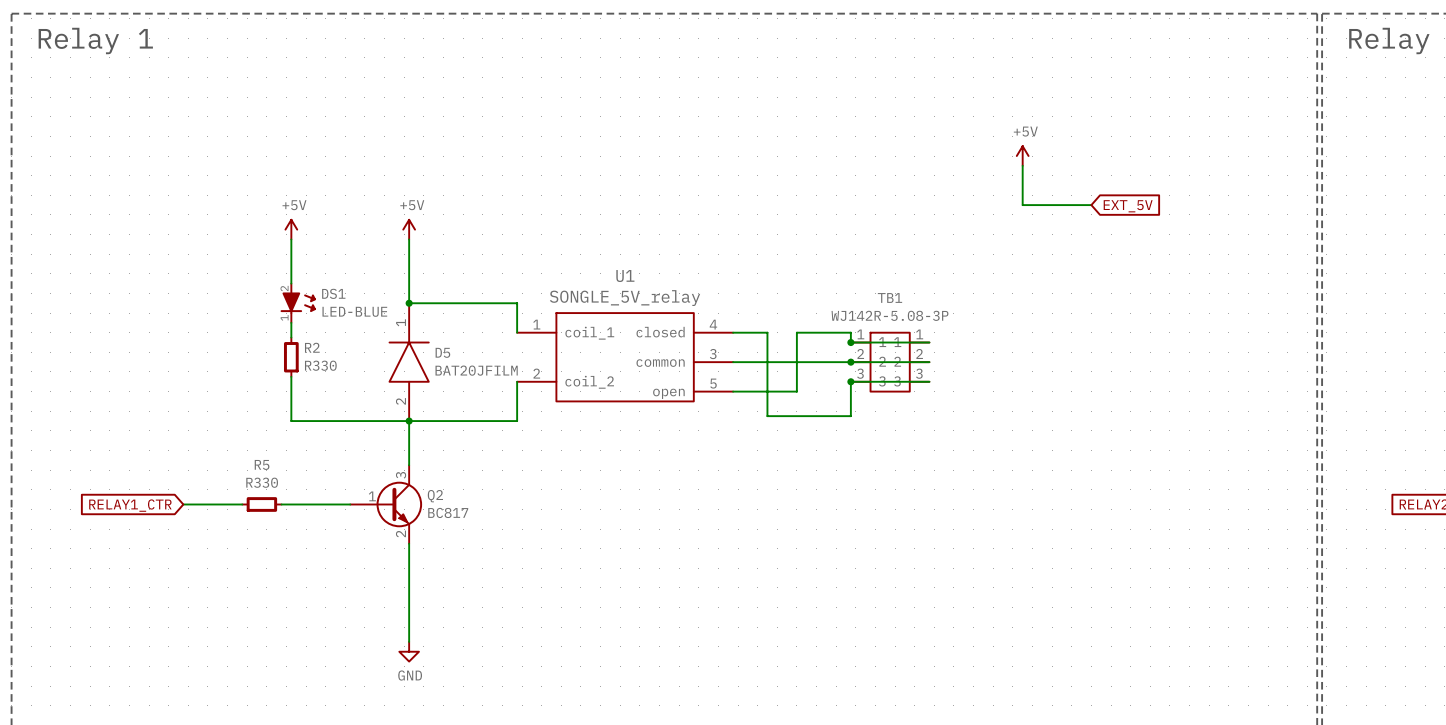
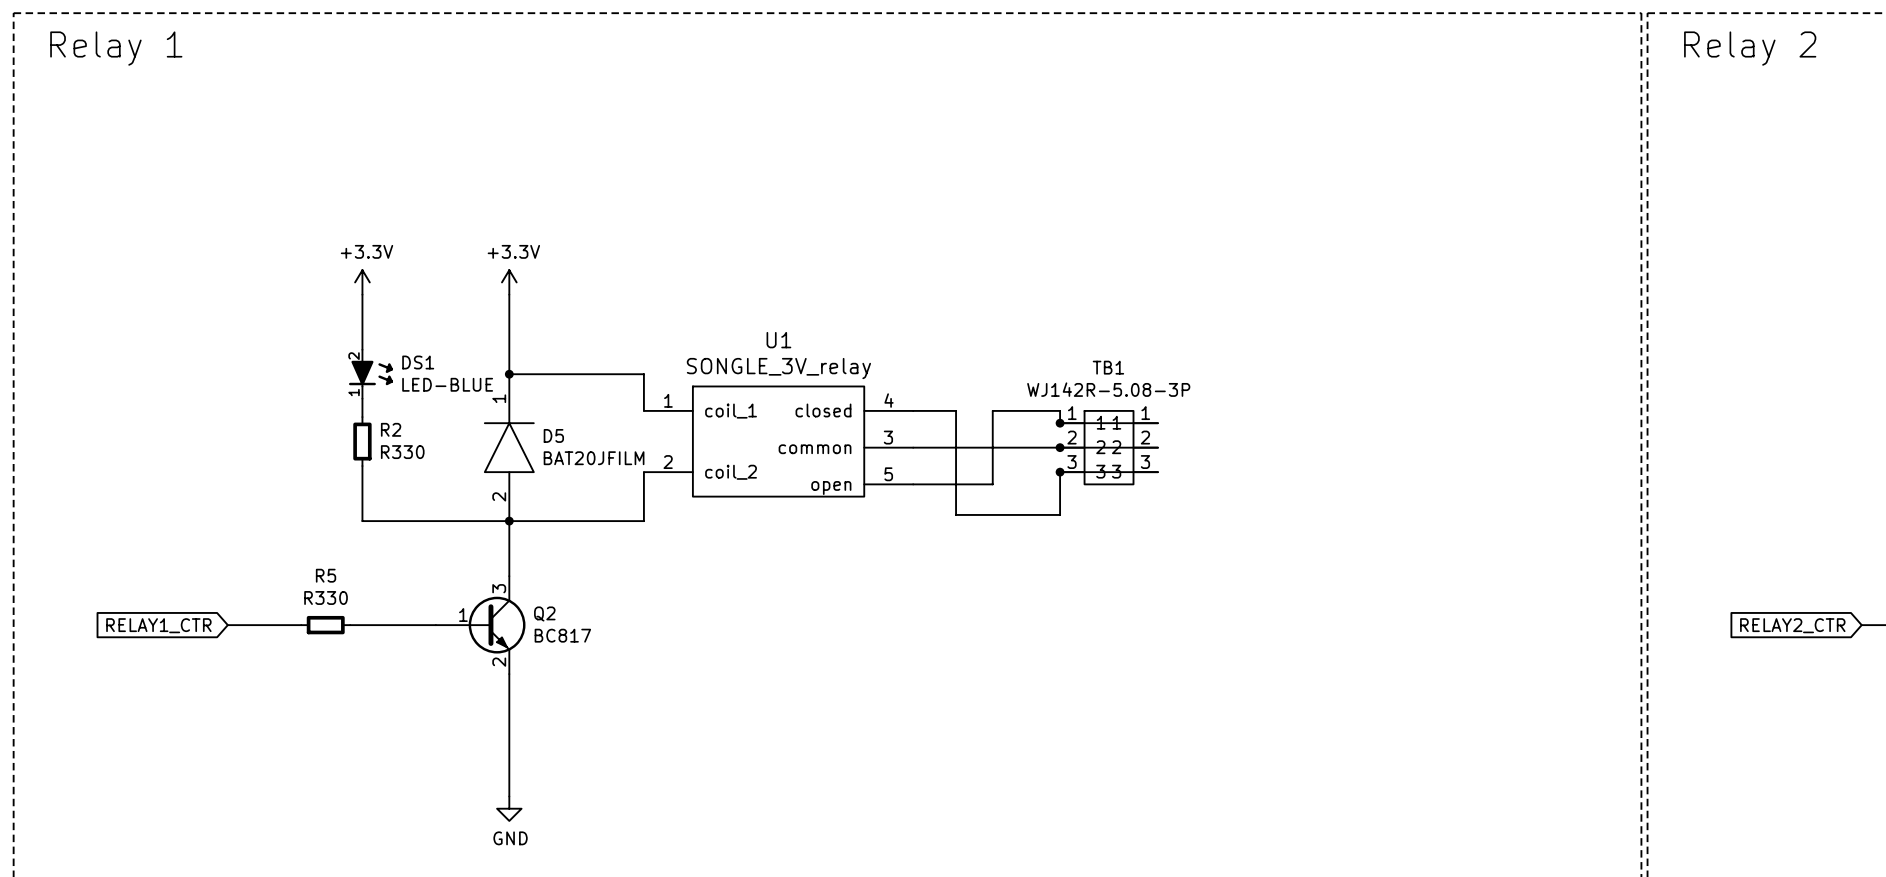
power symbol: +5V (1022, 156) -> none
wire: (1022, 165) (1022, 205) (1091, 205) -> none
global label: EXT_5V (1128, 206) -> none
power symbol: +5V (291, 229) -> +3.3V (362, 282)
power symbol: +5V (409, 229) -> +3.3V (509, 282)
U1 value: SONGLE_5V_relay (625, 298) -> SONGLE_3V_relay (778, 368)

